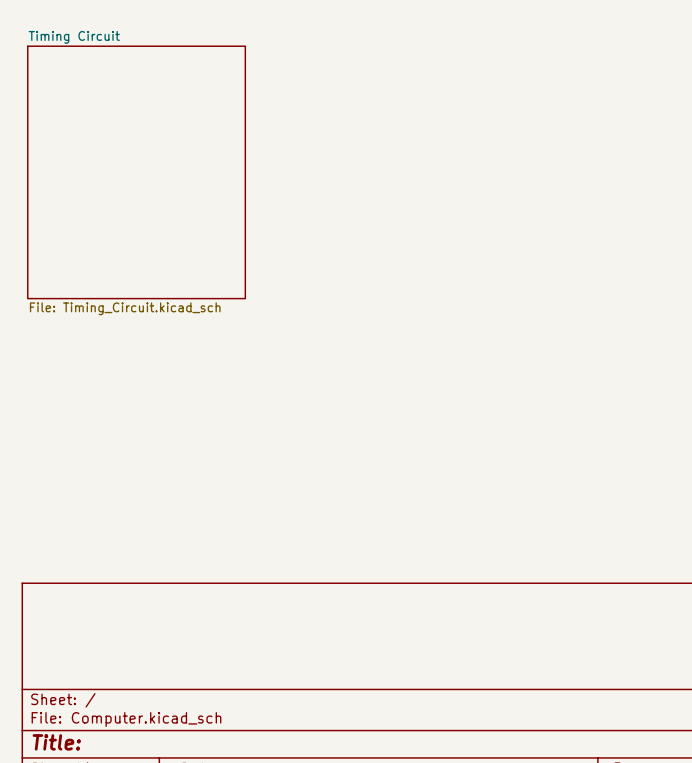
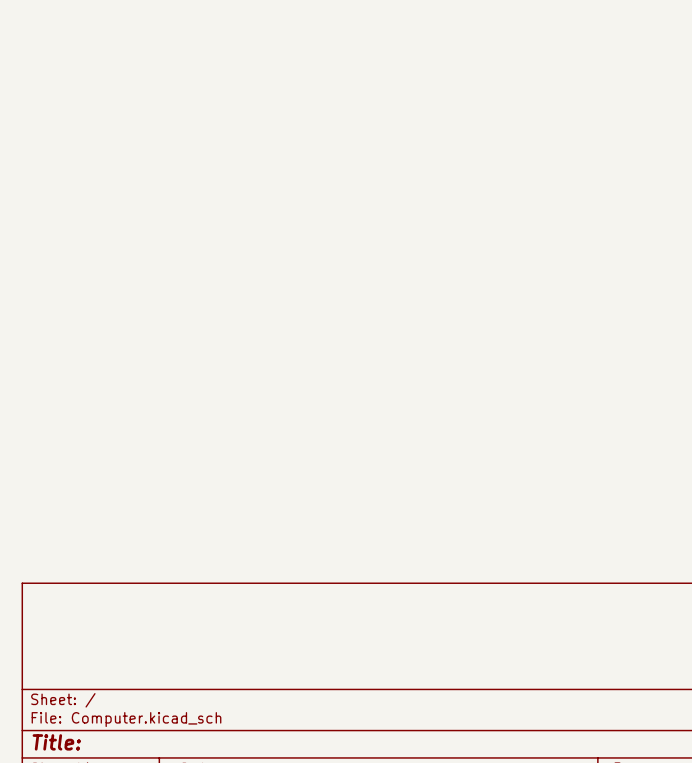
sheet Timing Circuit: File: Timing_Circuit.kicad_sch (136, 172) -> none

